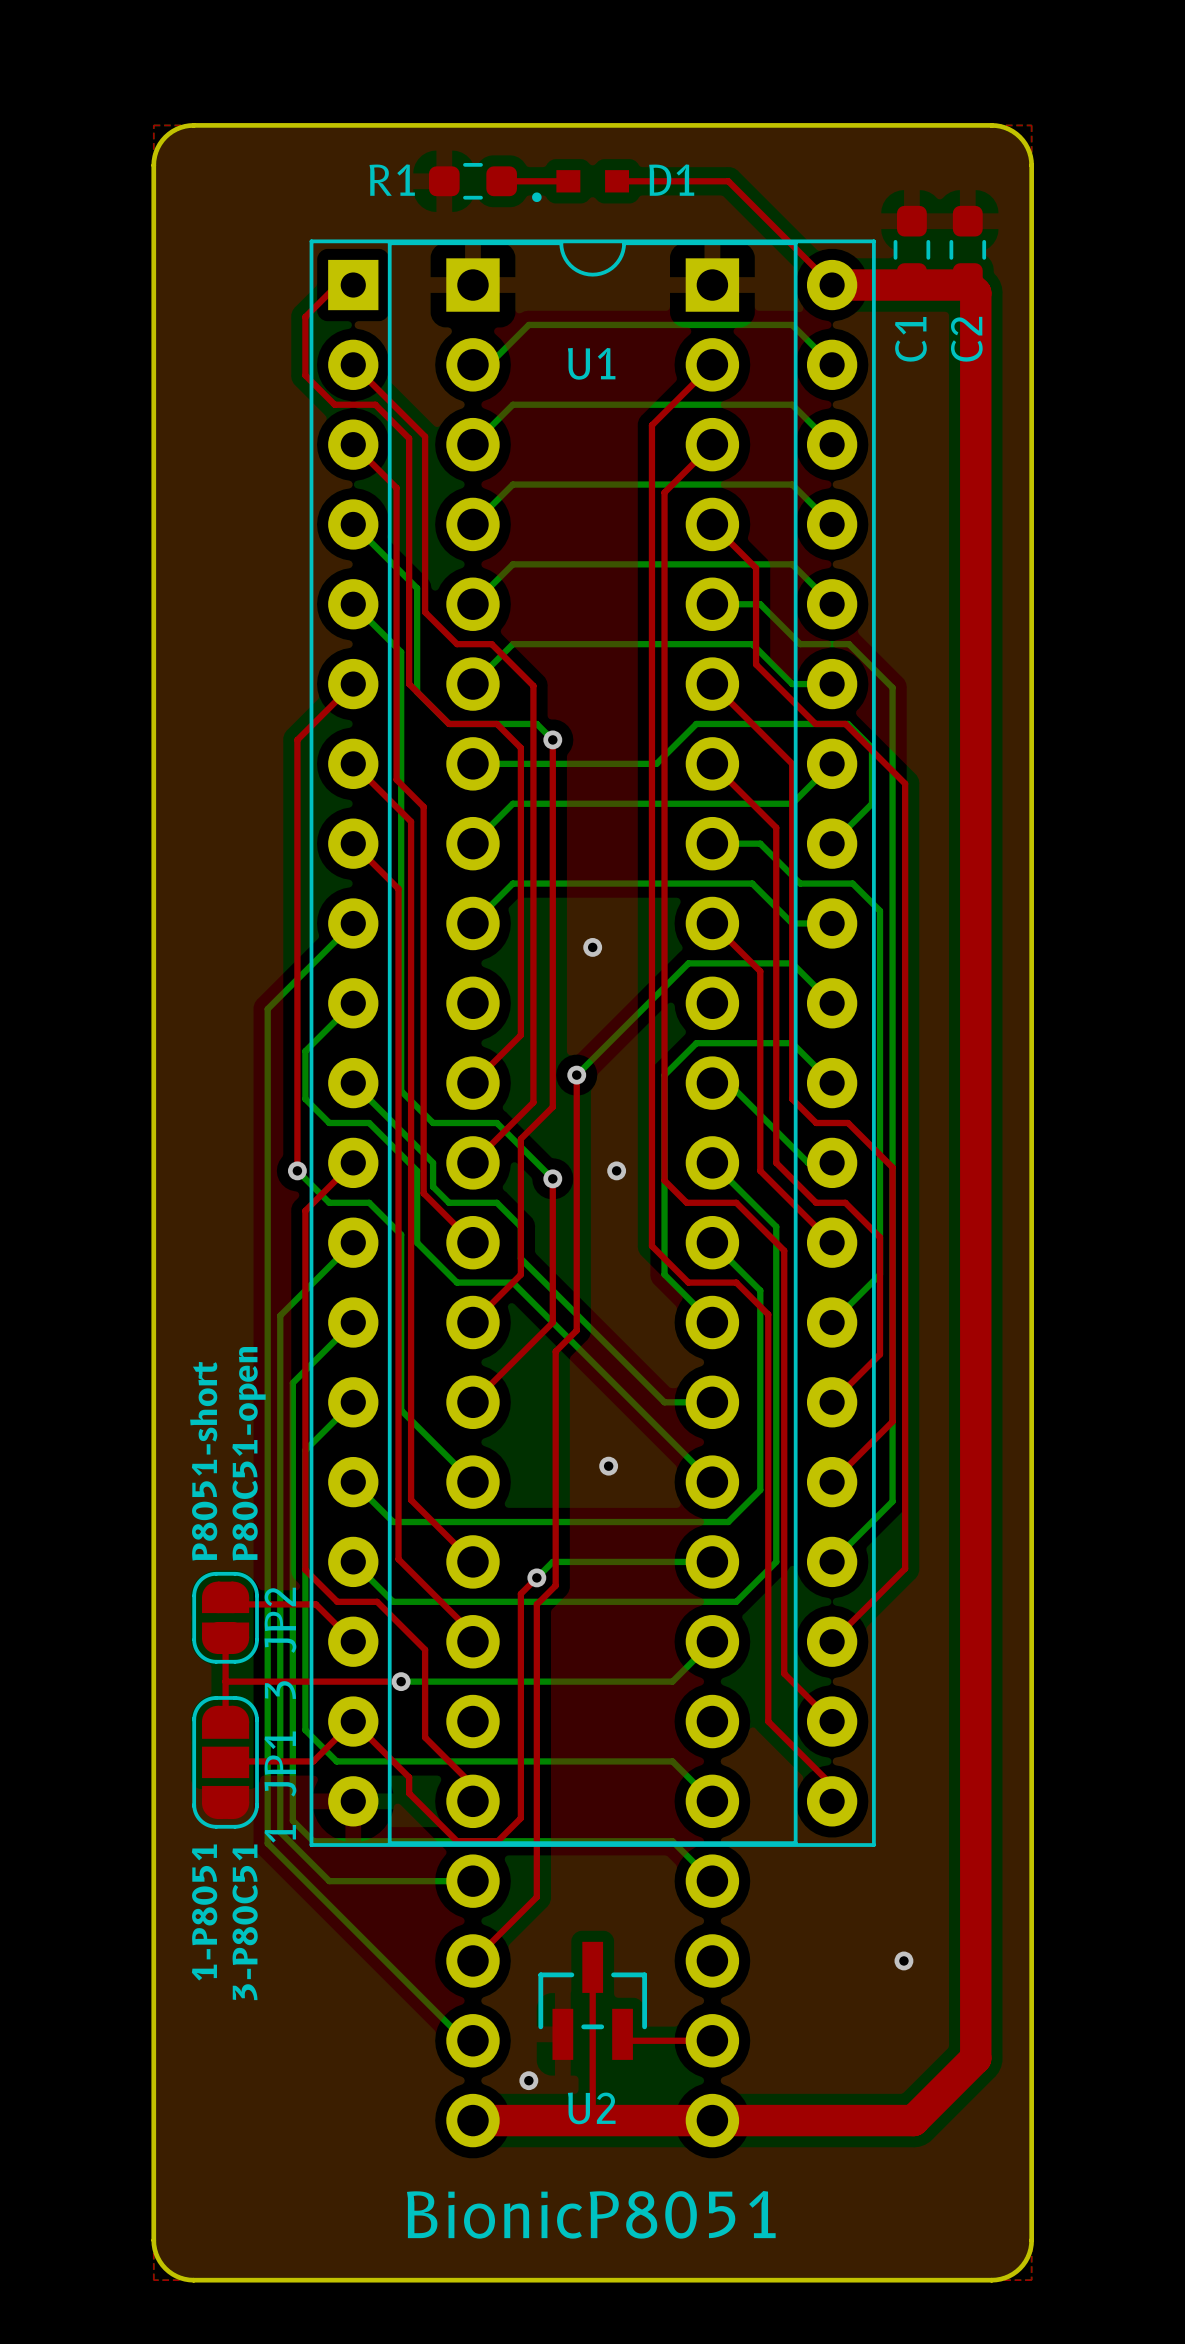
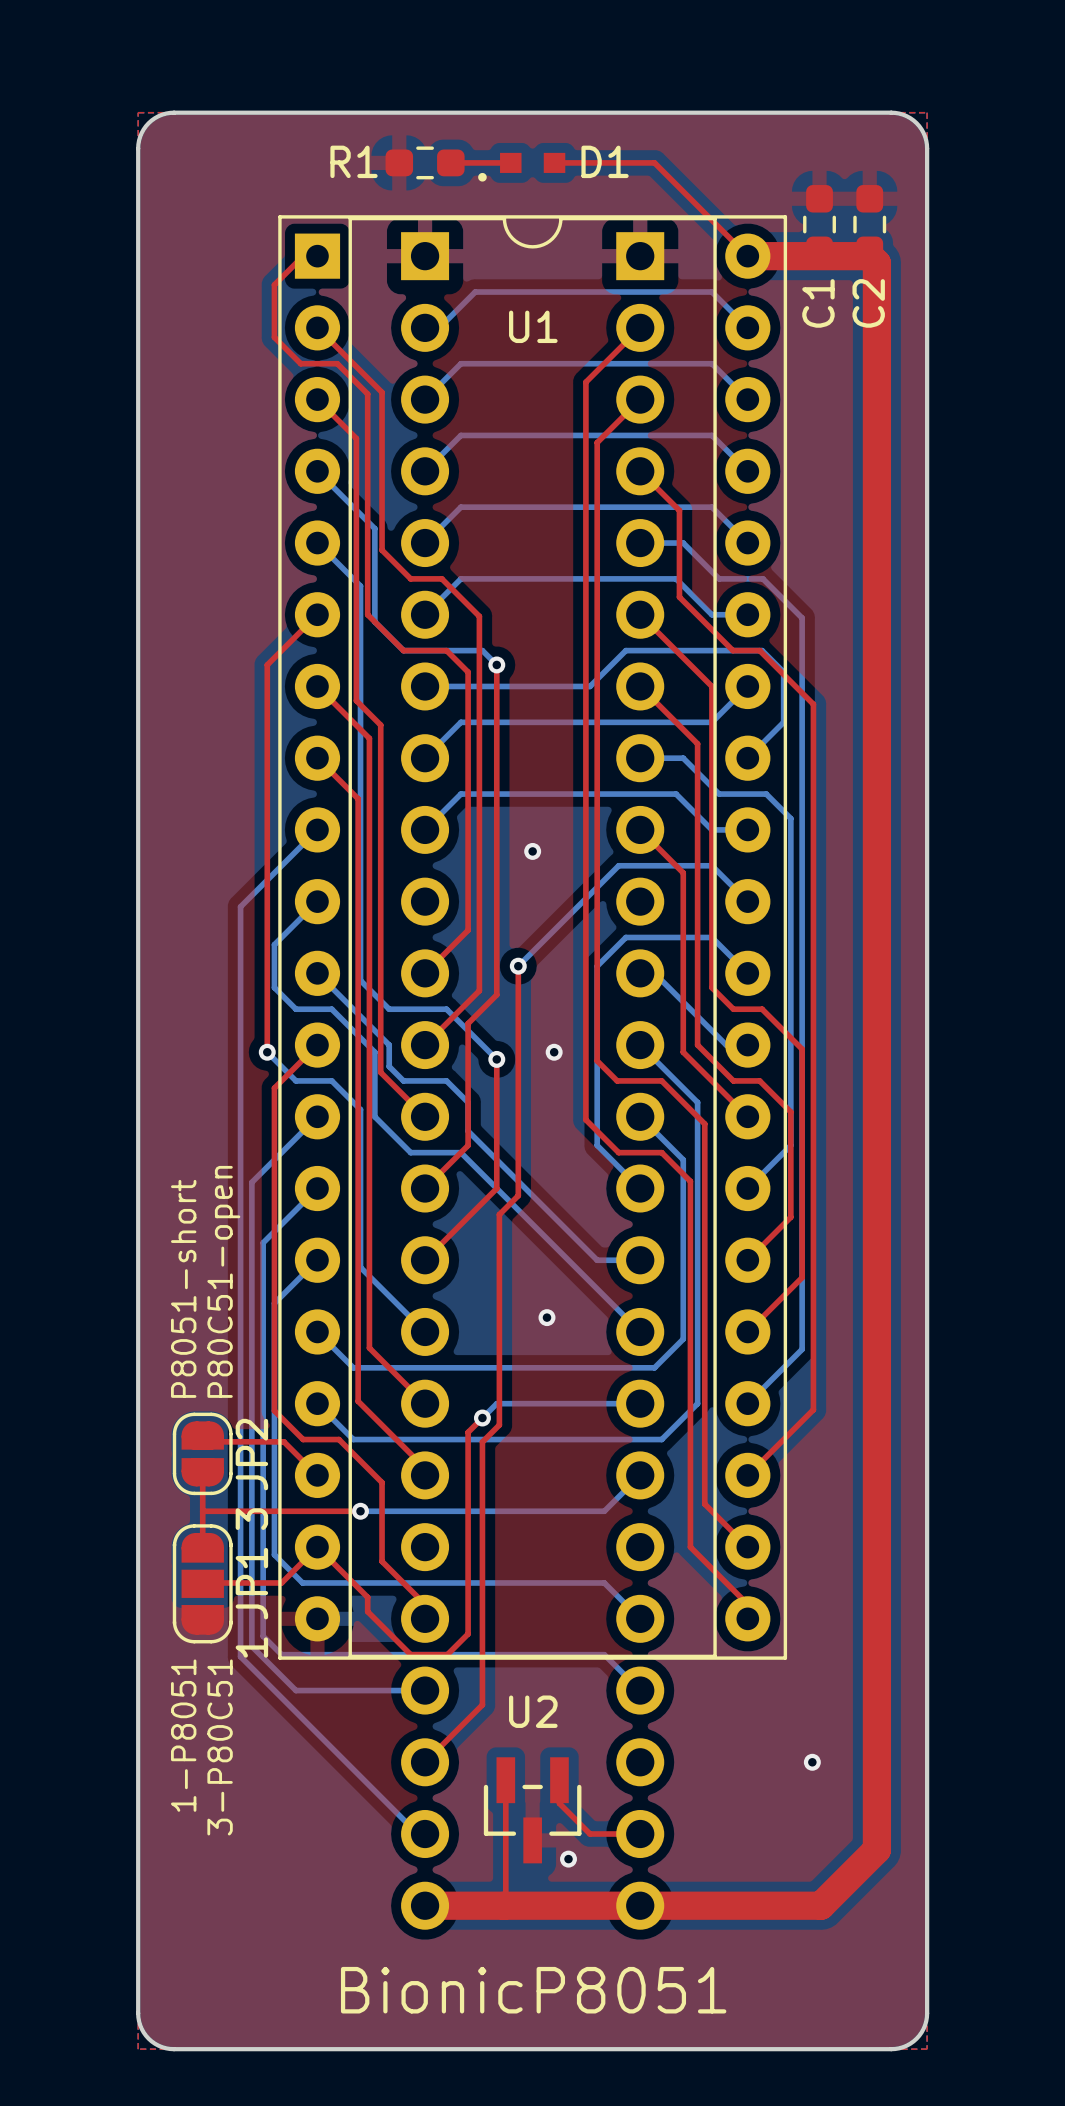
top track: (592, 1967) (592, 2120) -> none
top track: none -> (505, 1780) (505, 1903) (503, 1905)
U2 rotation: 0° (592, 2000) -> 180° (532, 1810)
top track: (622, 2034) (628, 2040) (656, 2040) -> (559, 1780) (559, 1803) (590, 1834)
via position: (528, 2080) -> (568, 1859)

